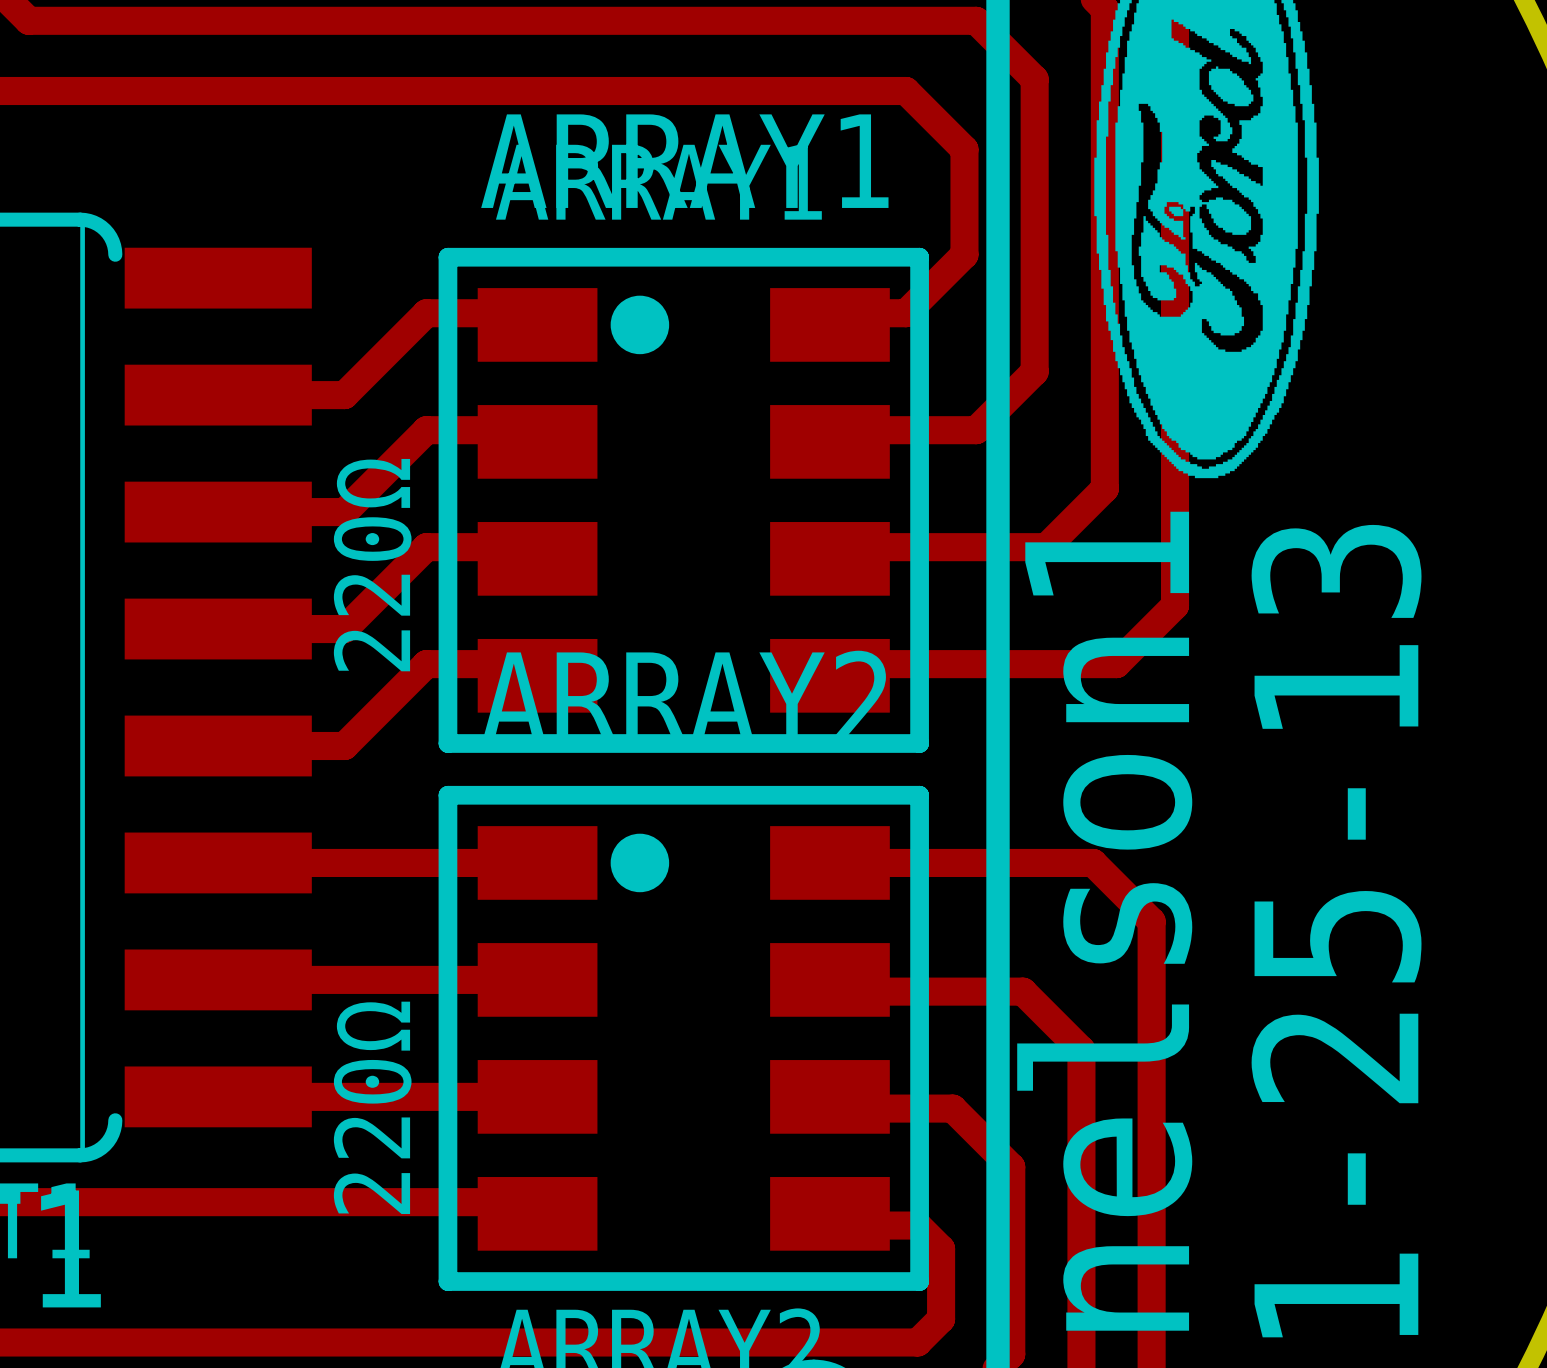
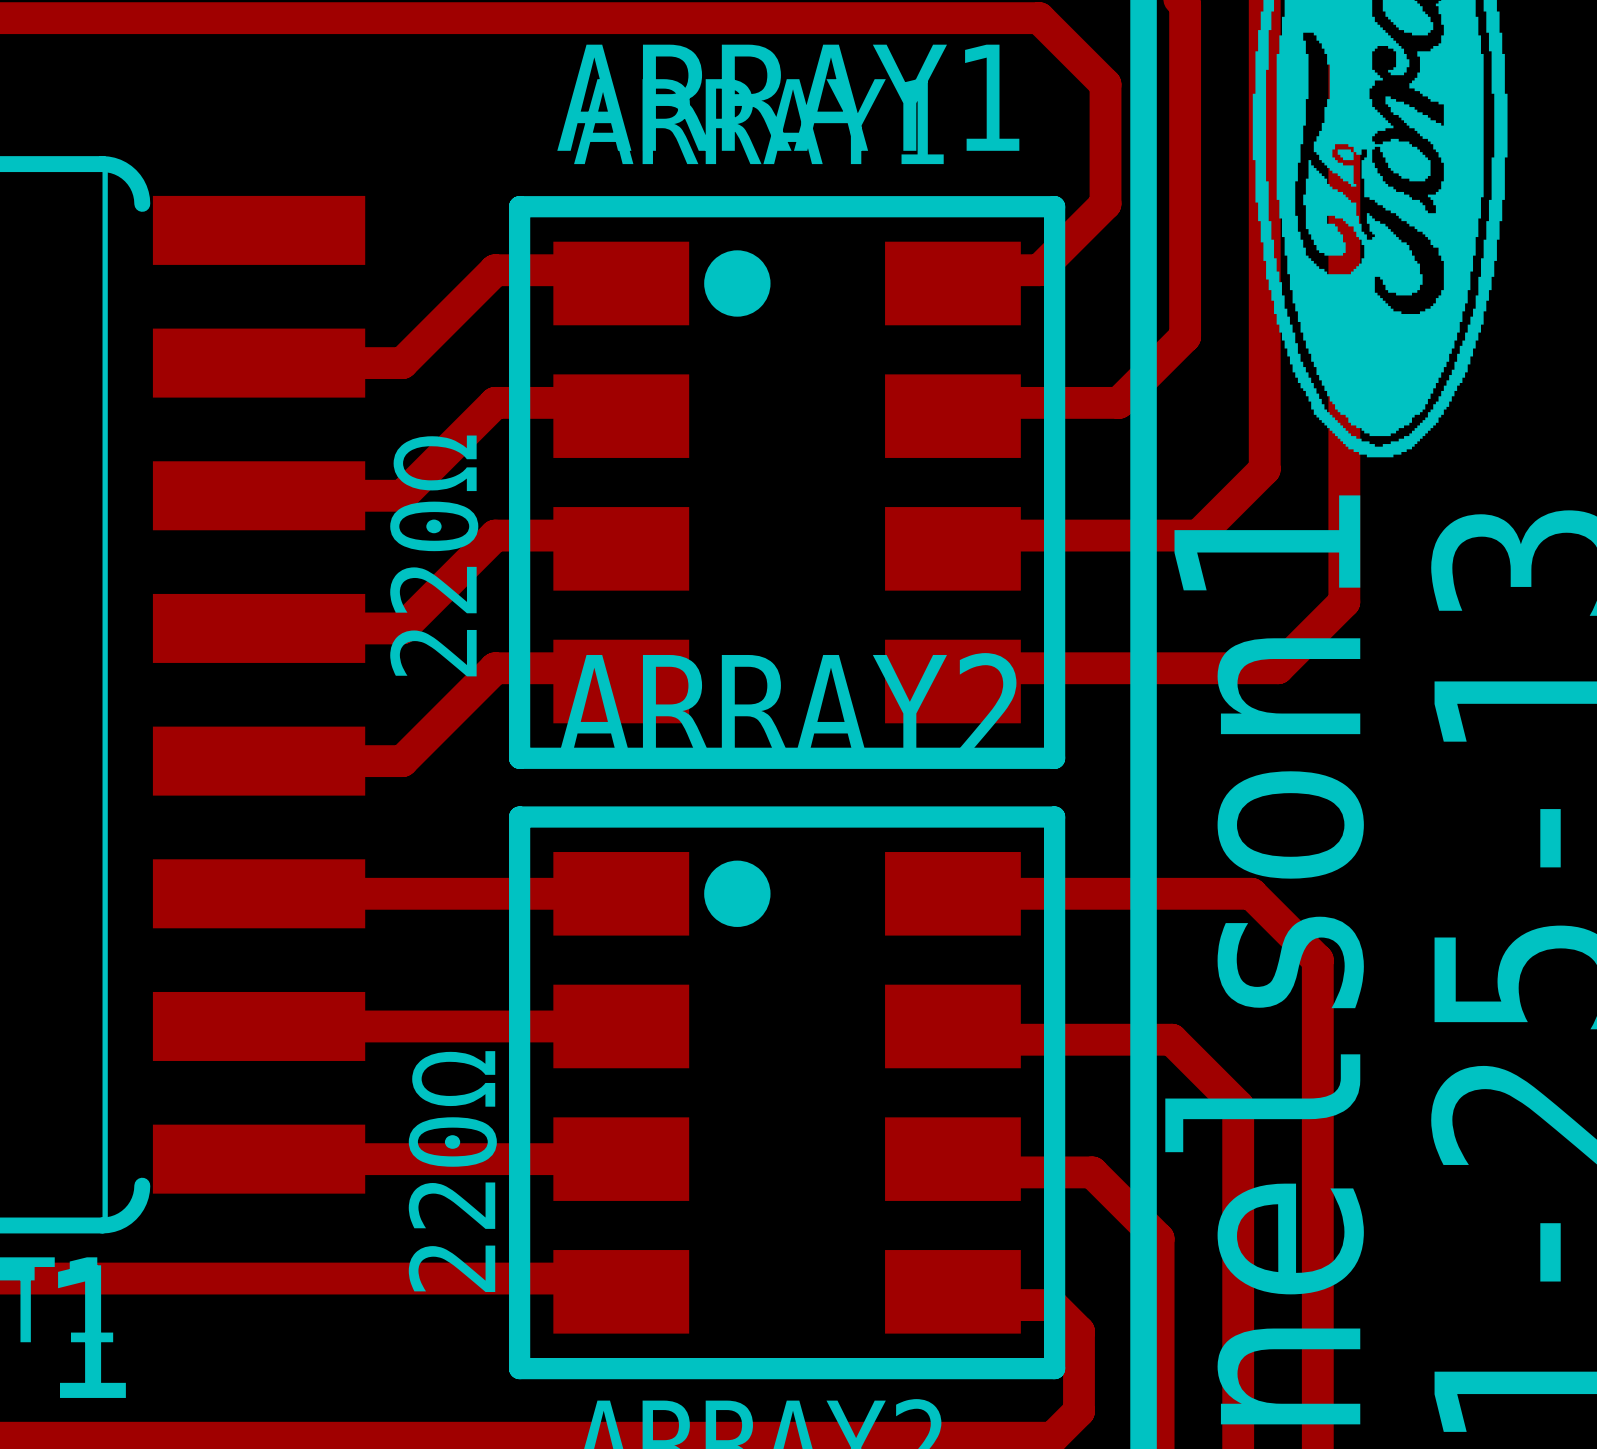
text position: 220Ω (372, 1107) -> 220Ω (452, 1171)

